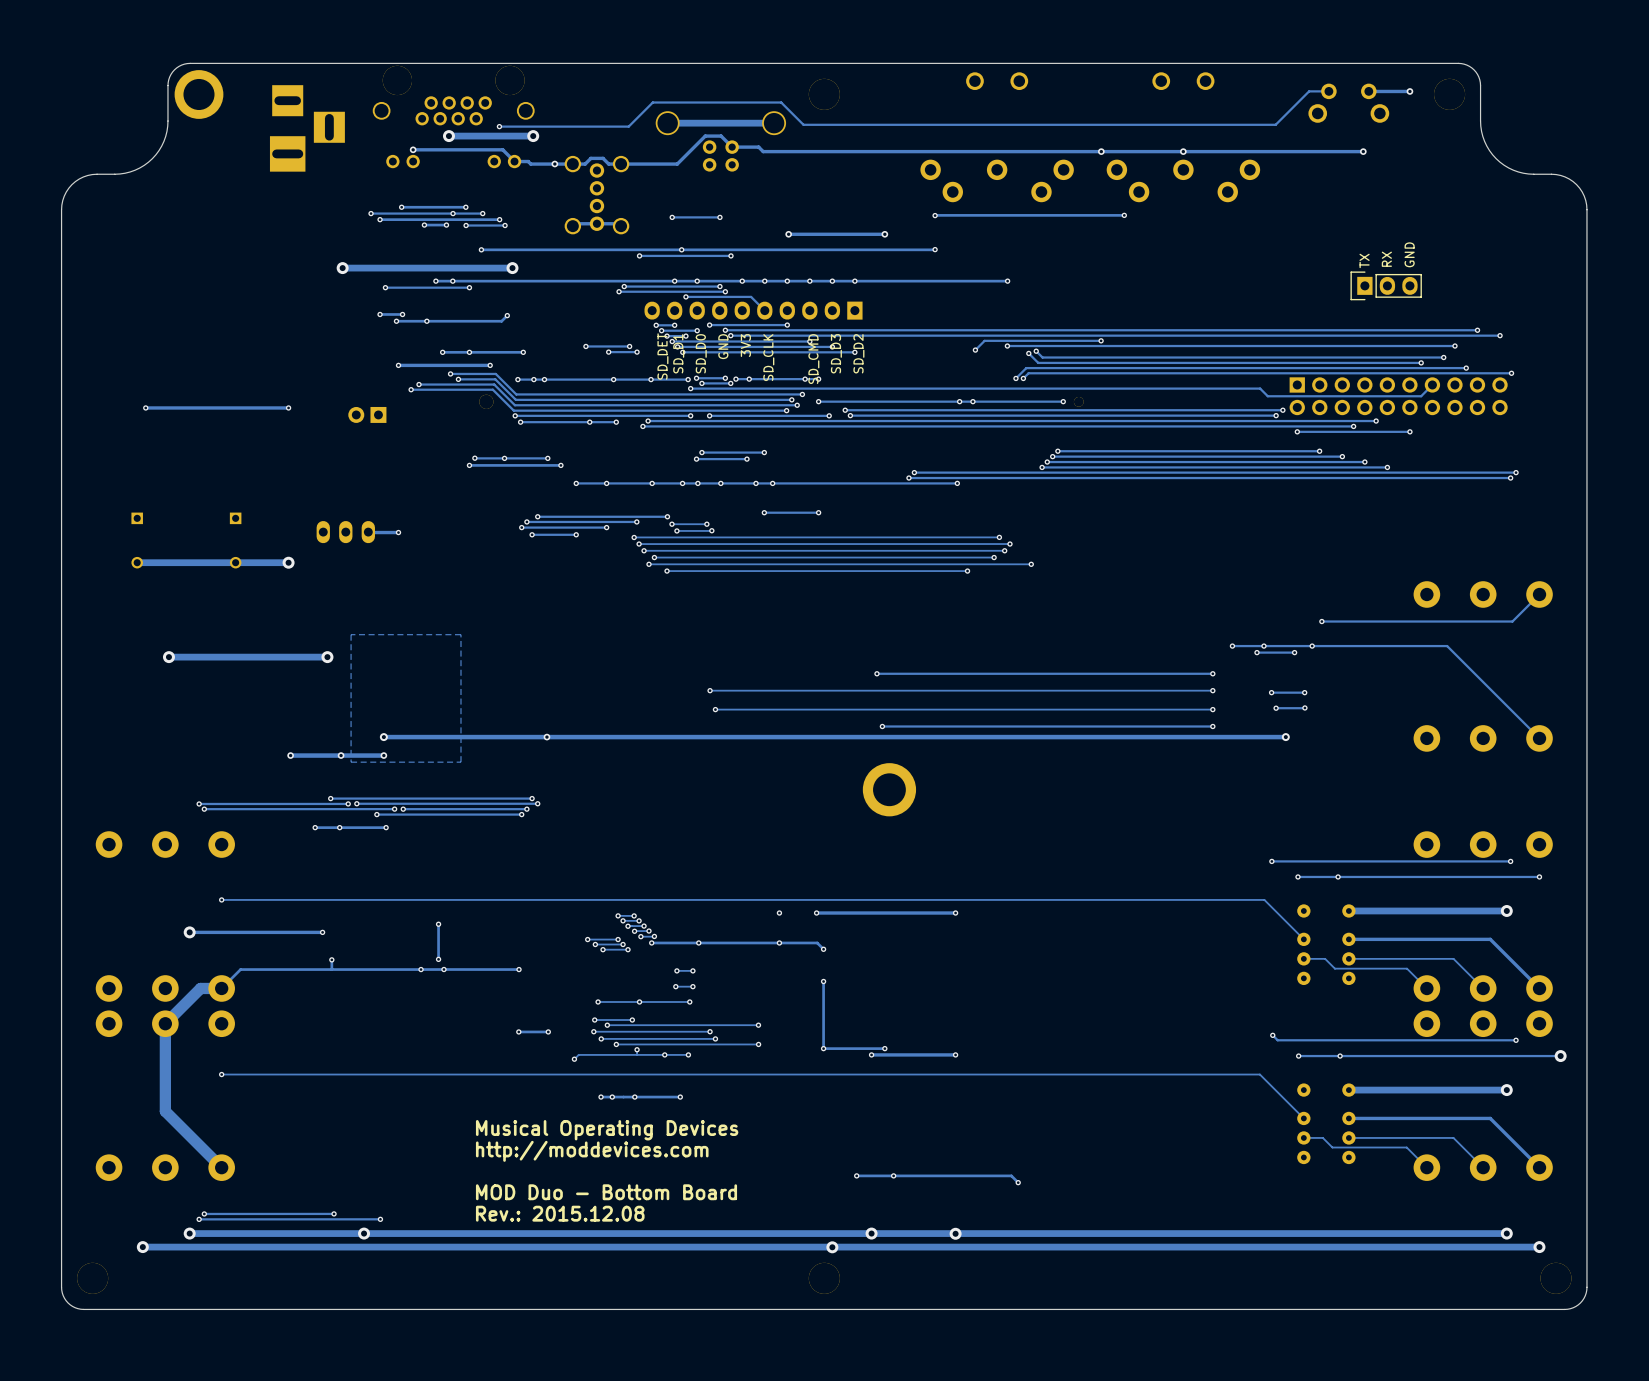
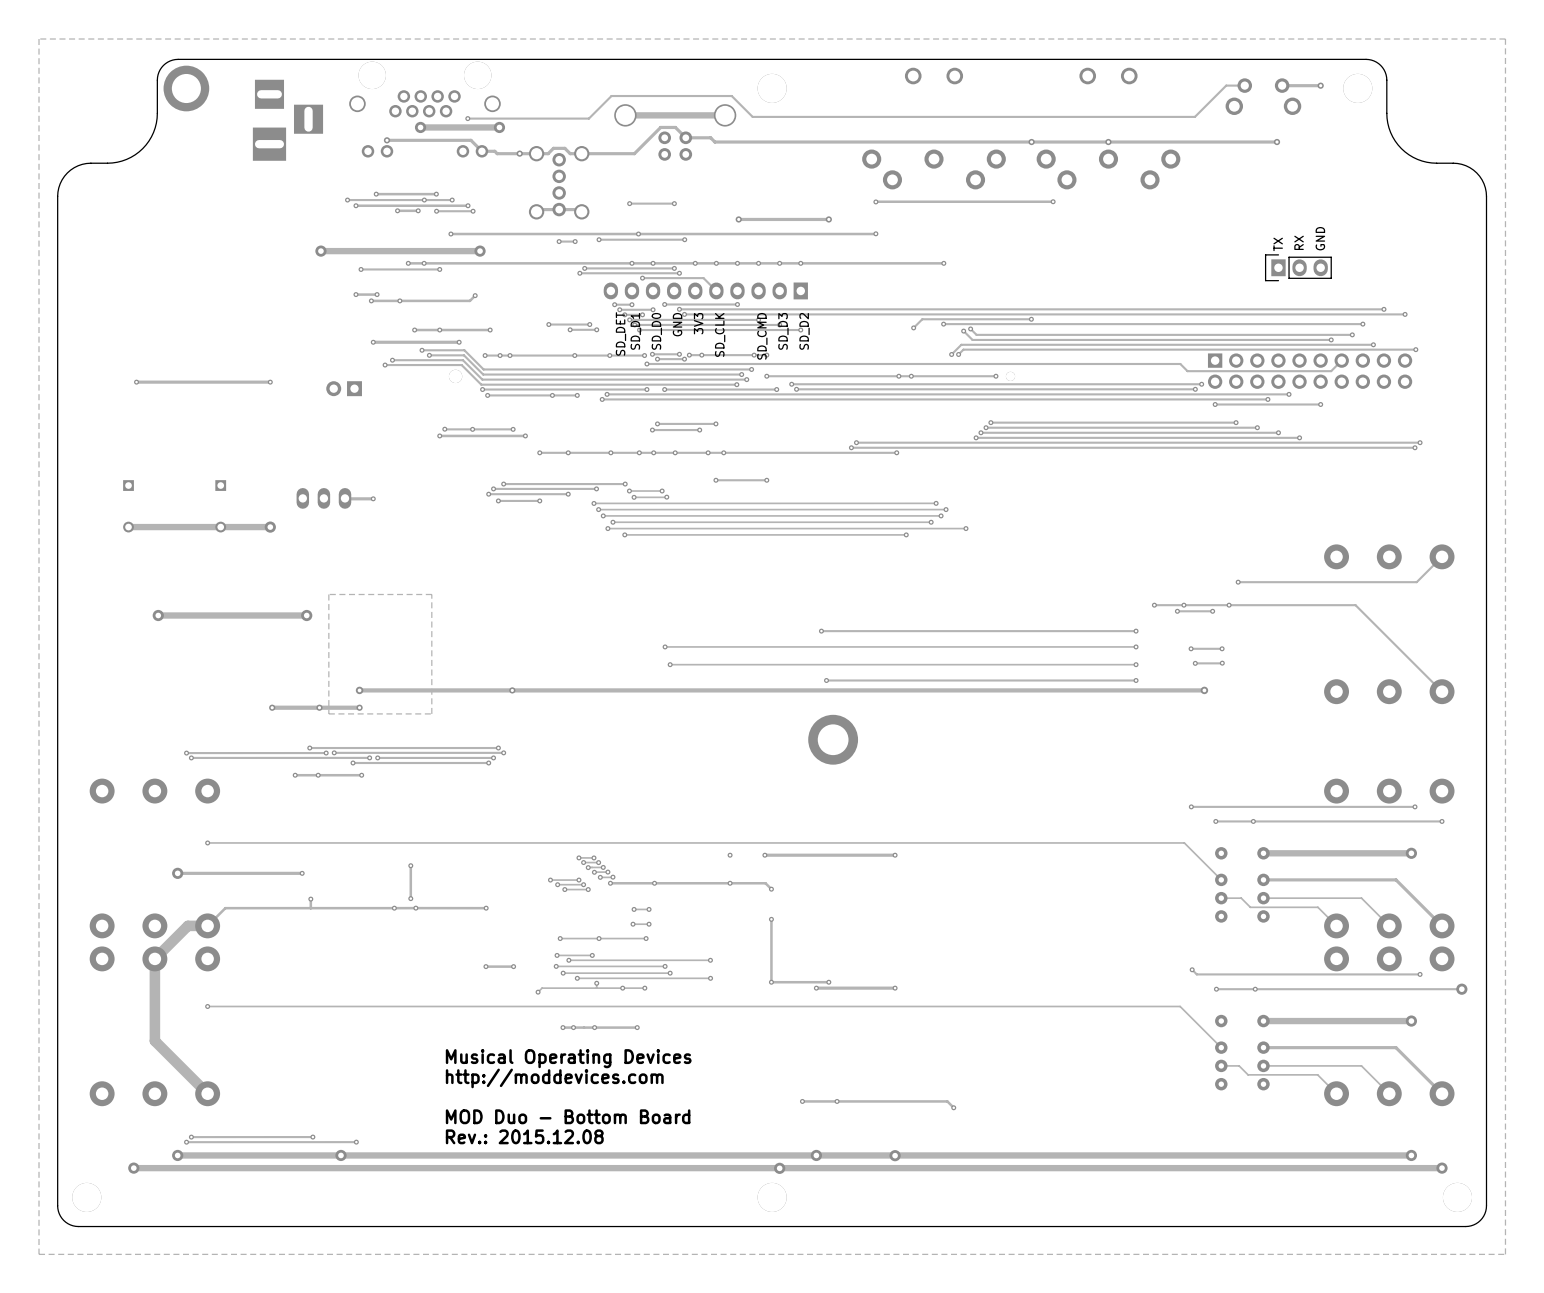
zone outline: none -> (1505, 39) (39, 39) (39, 1254) (1505, 1254) (1505, 39)
via: none -> (559, 241)
track: none -> (575, 241) (559, 241)
via: none -> (575, 241)

